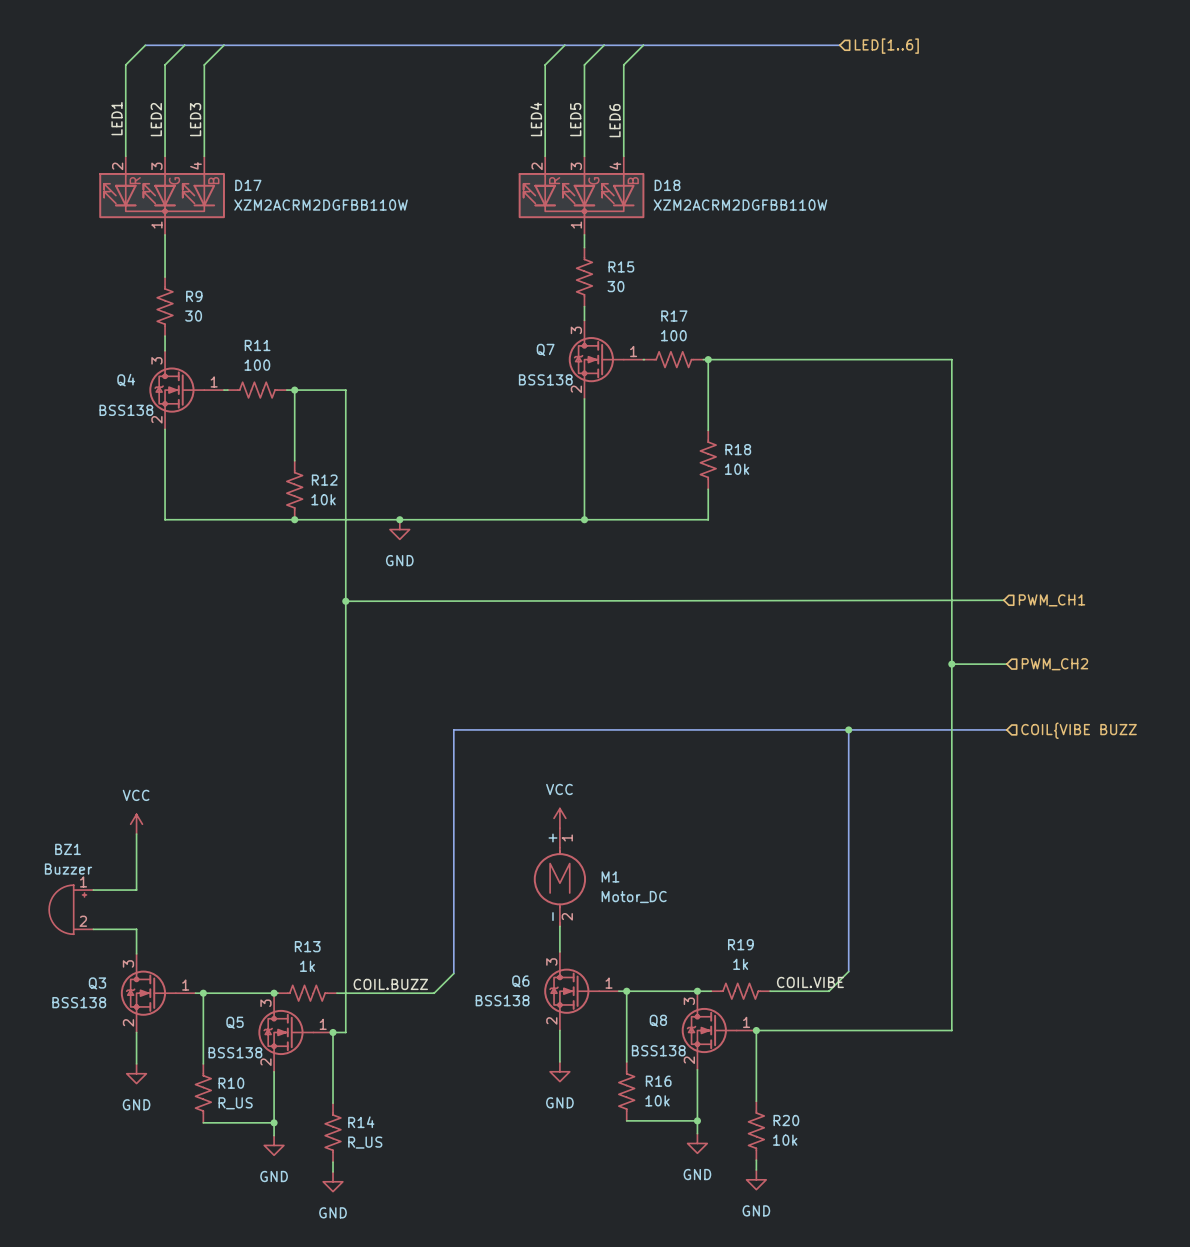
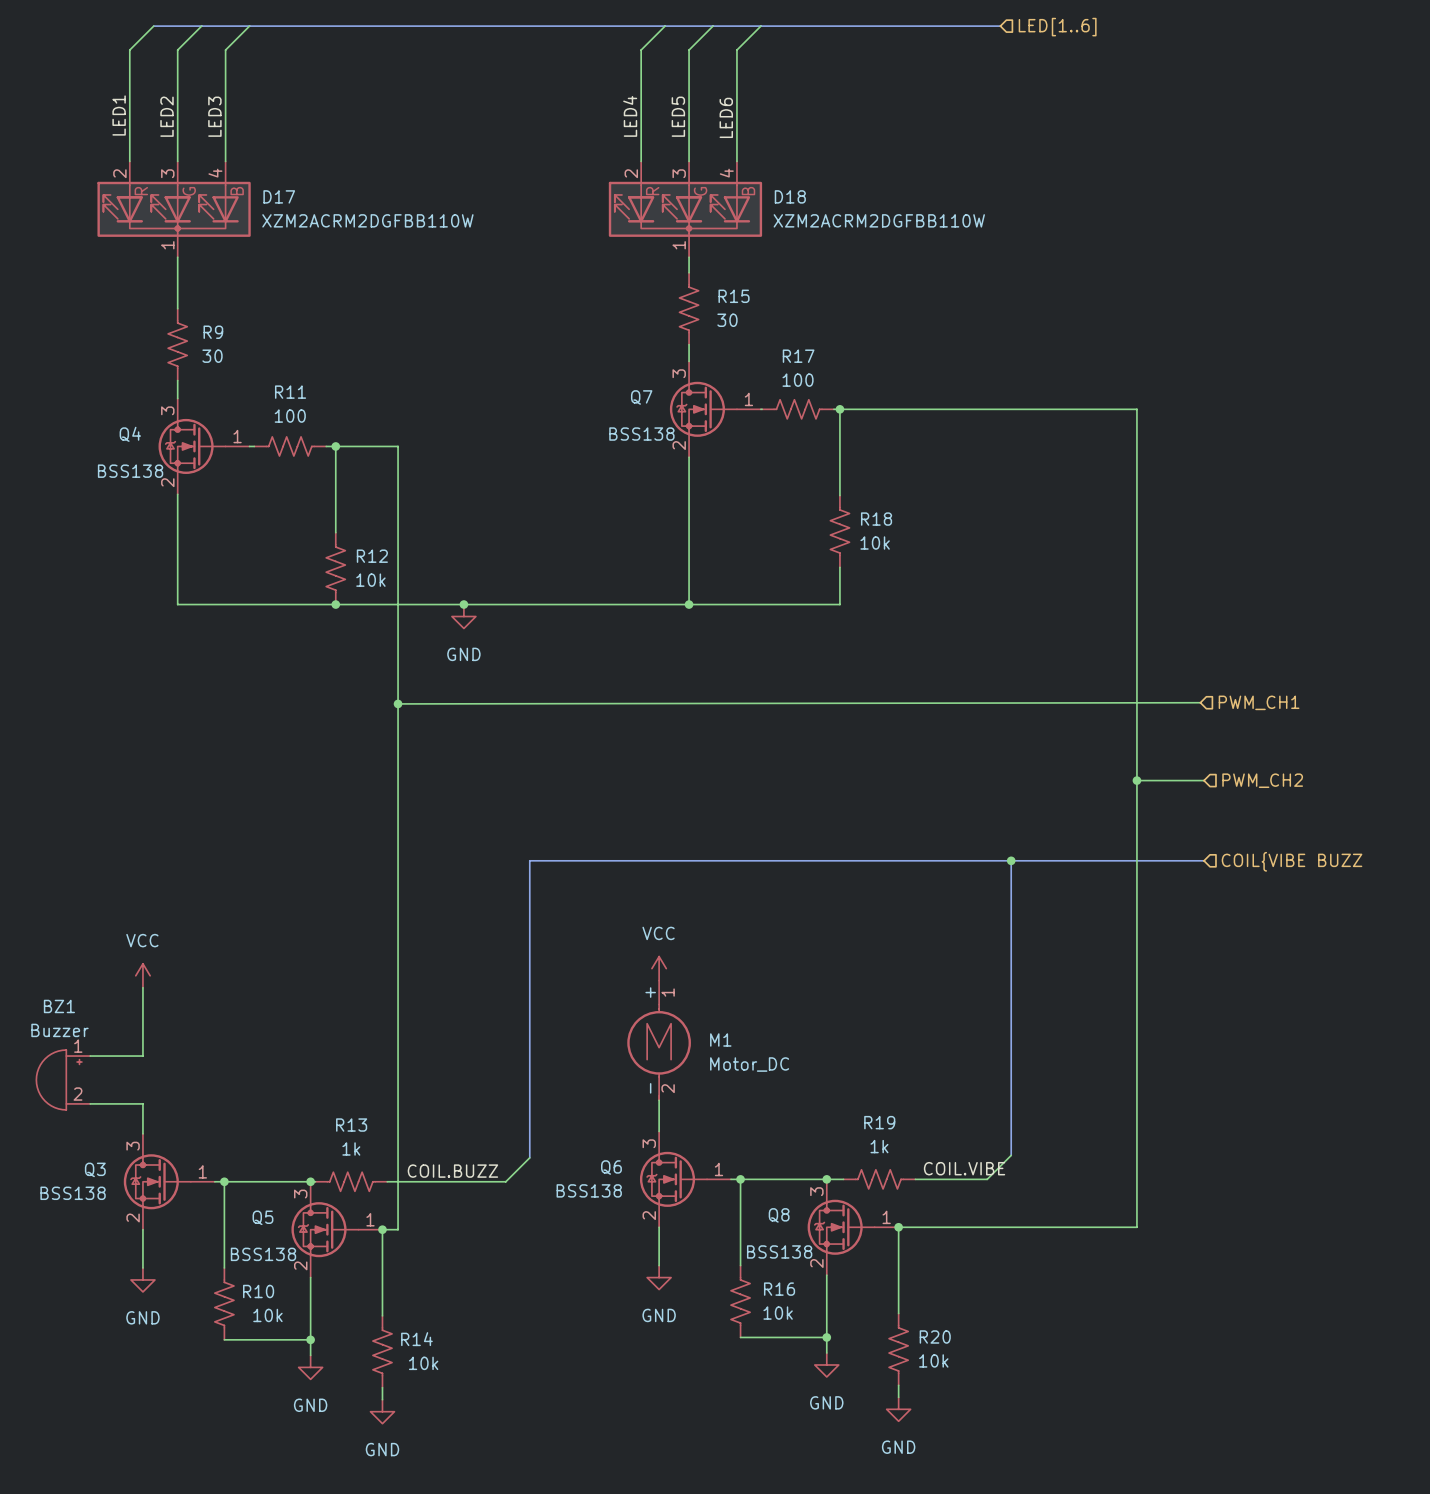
R10 value: R_US (235, 1103) -> 10k (267, 1315)
R14 value: R_US (365, 1142) -> 10k (423, 1363)

